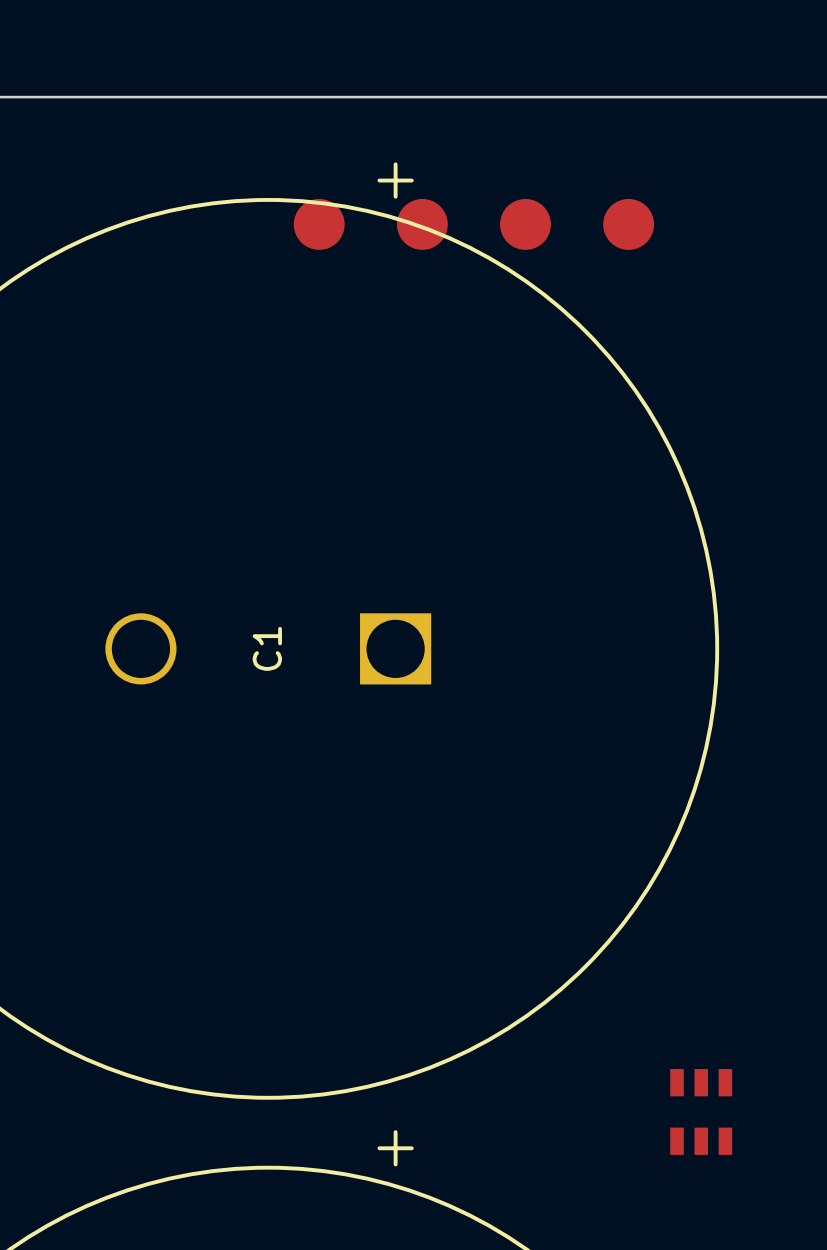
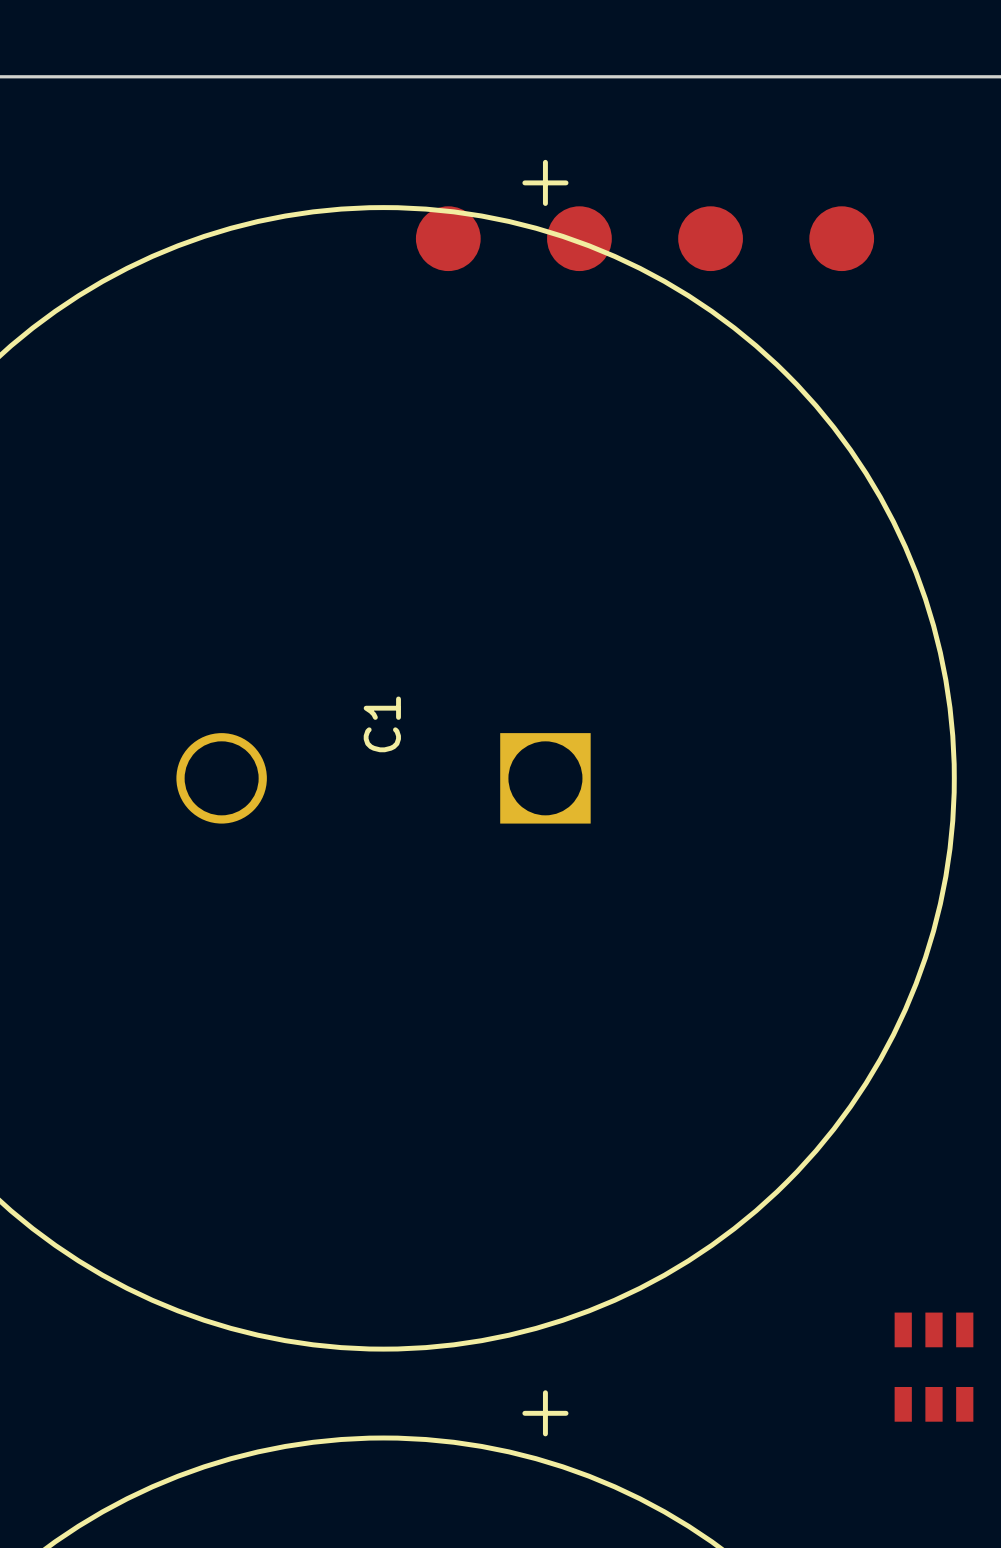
C1 name position: C1 (267, 648) -> C1 (382, 724)

